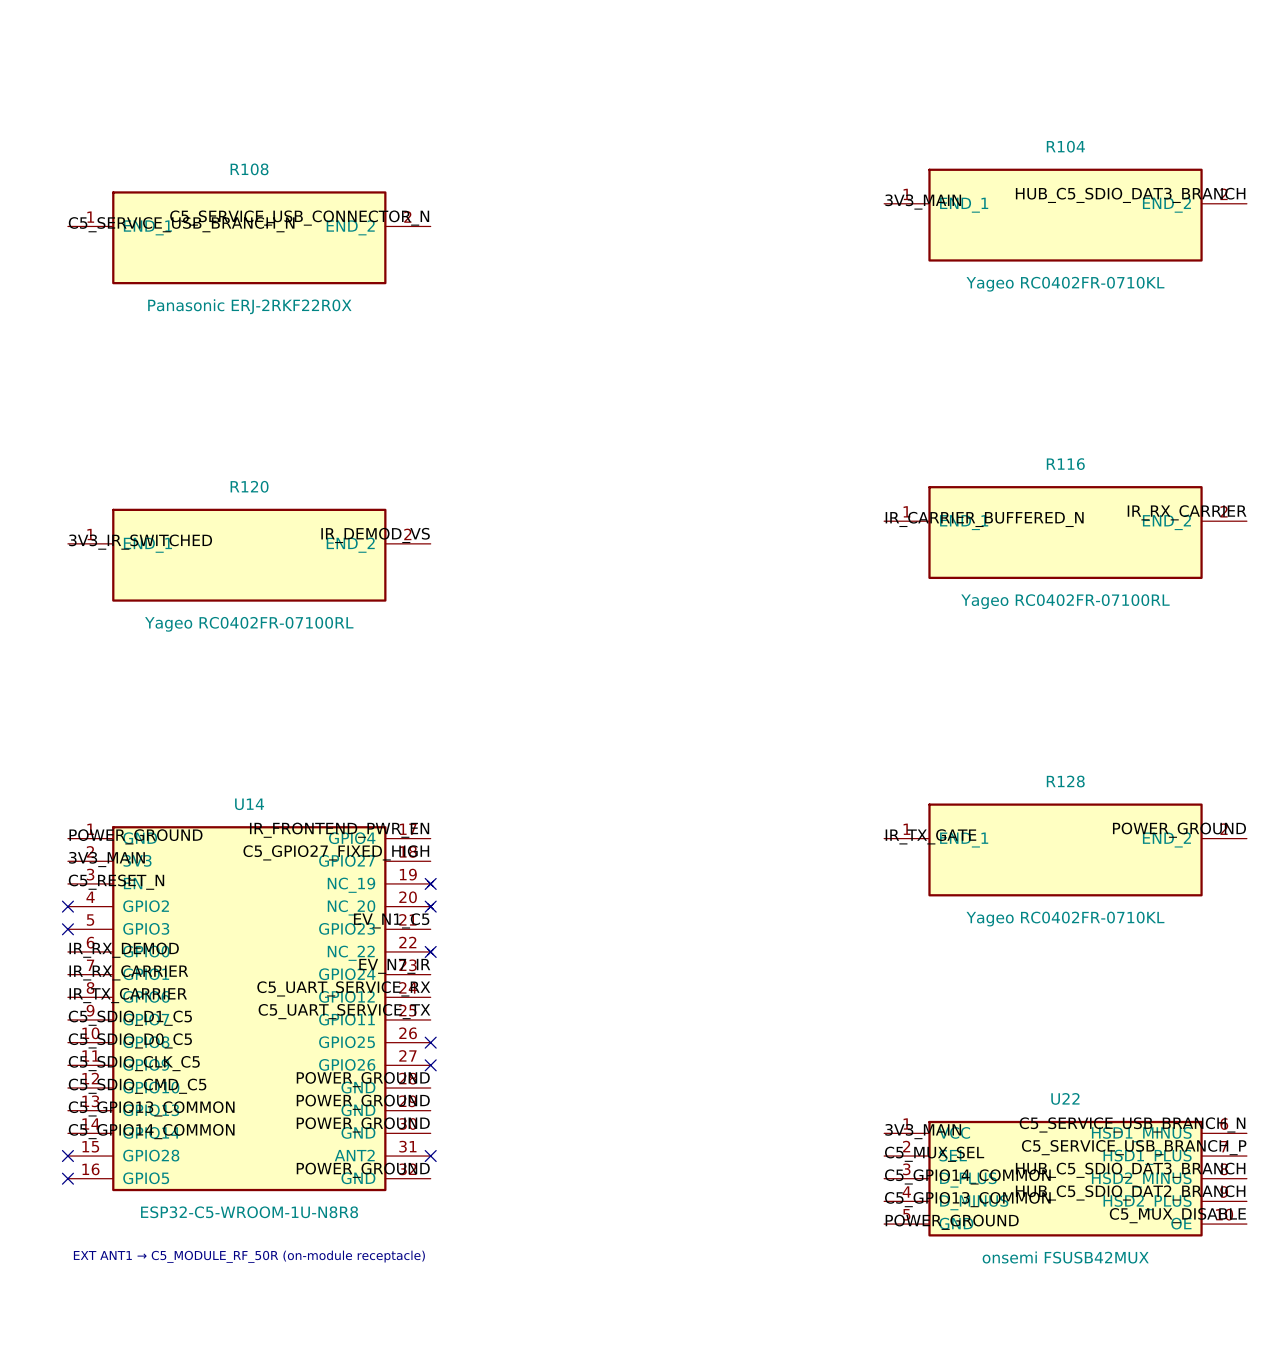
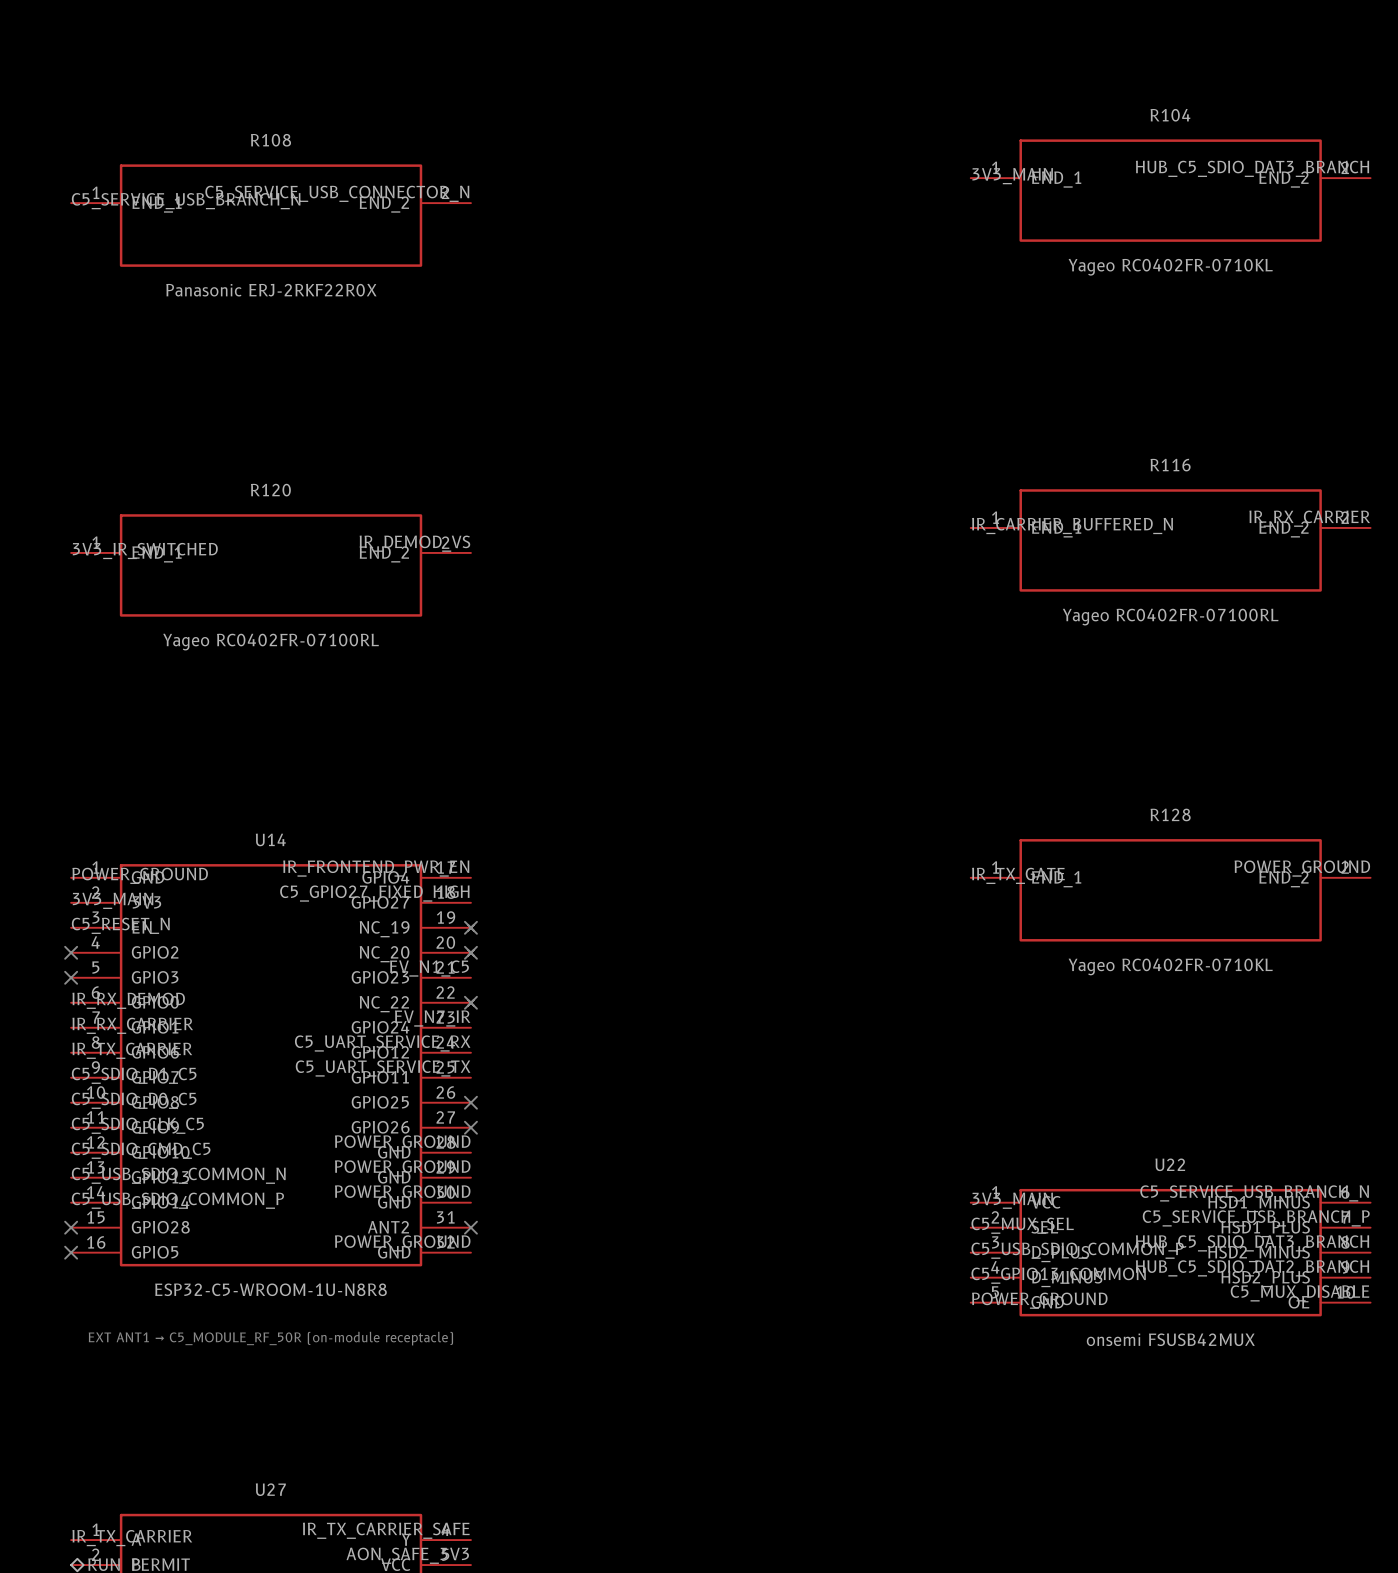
label: C5_GPIO13_COMMON (151, 1108) -> C5_USB_SDIO_COMMON_N (178, 1175)
label: C5_GPIO14_COMMON (151, 1131) -> C5_USB_SDIO_COMMON_P (177, 1200)
label: C5_GPIO14_COMMON (967, 1176) -> C5_USB_SDIO_COMMON_P (1077, 1250)

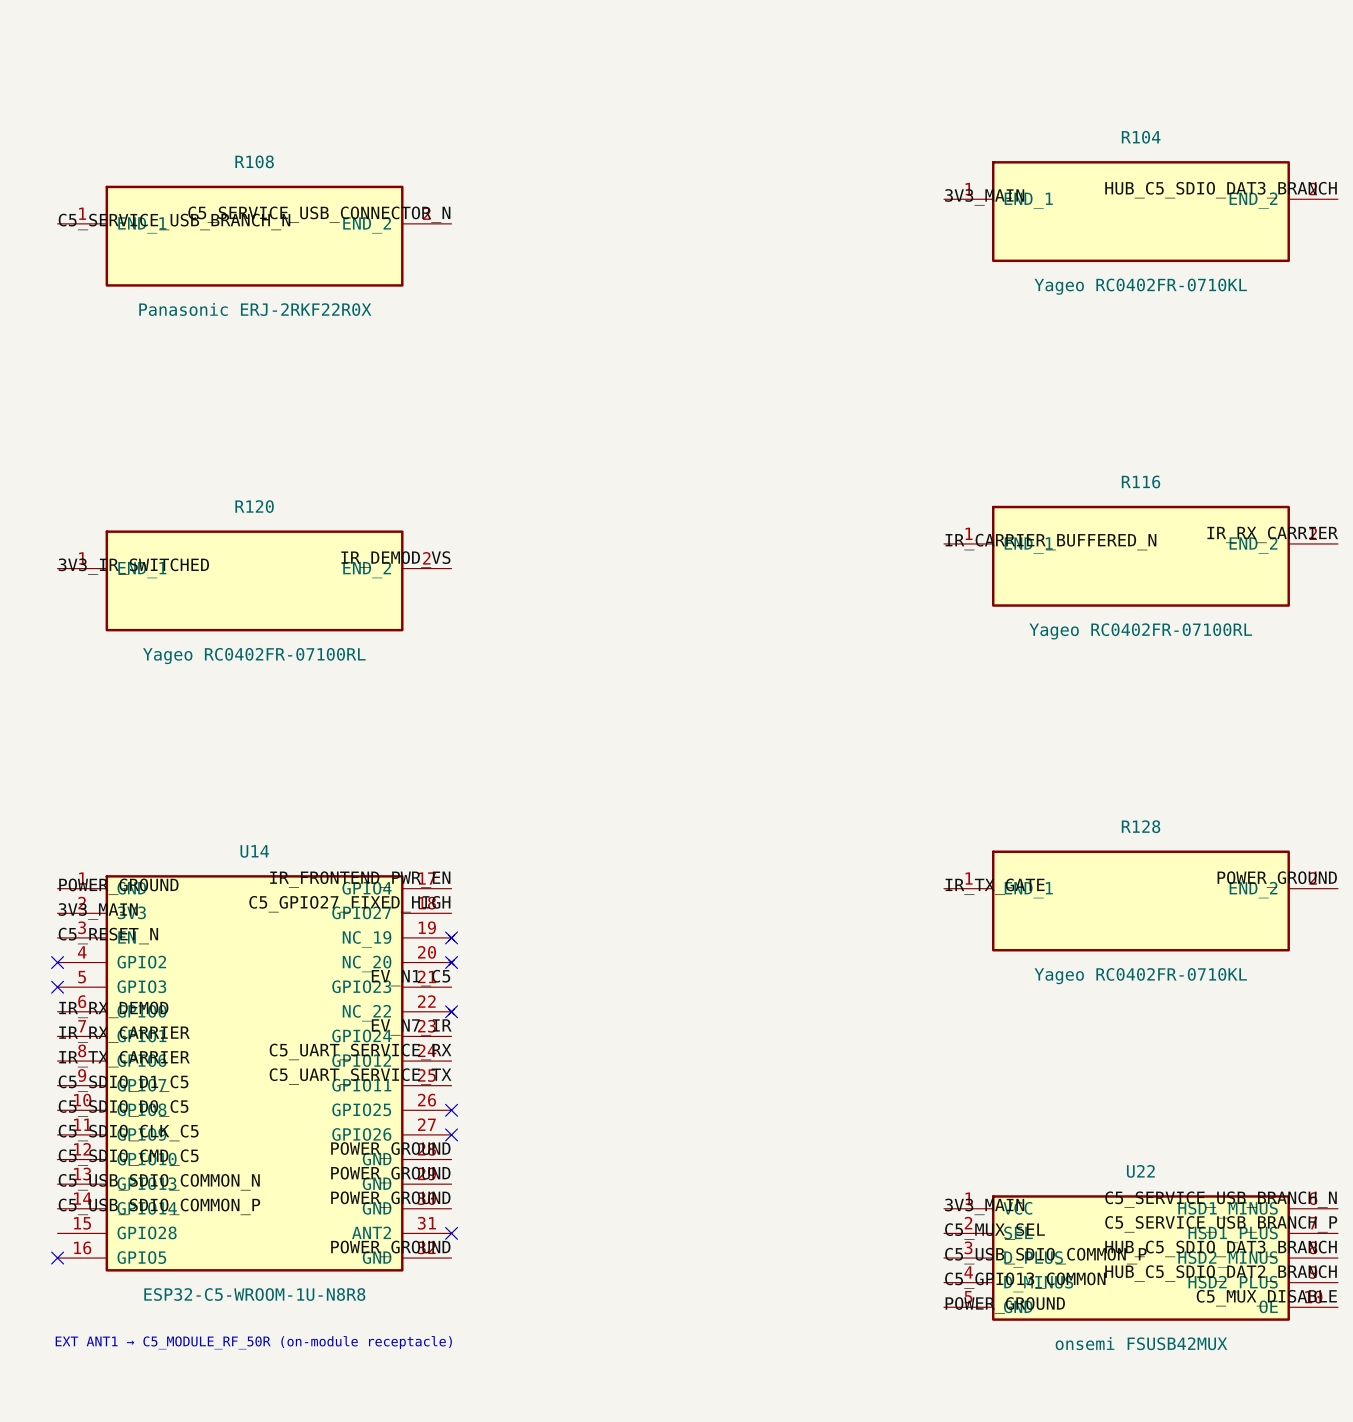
no-connect mark: (71, 1227) -> none

